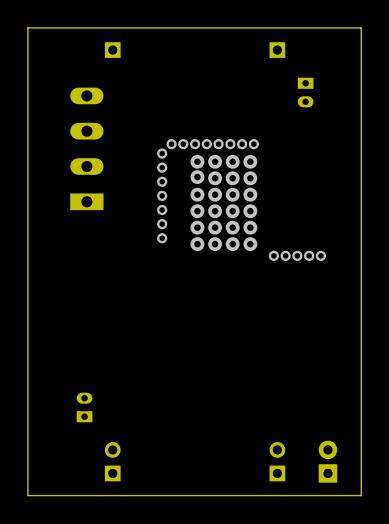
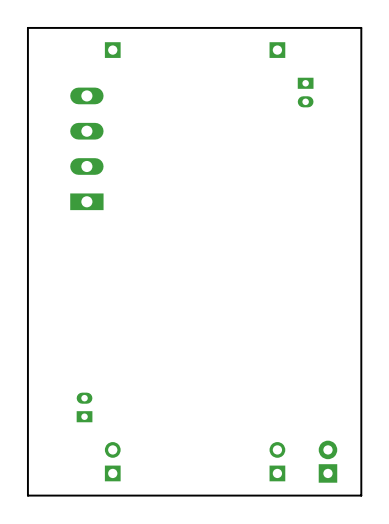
via: (171, 144) -> none
via: (183, 144) -> none
via: (195, 144) -> none
via: (206, 144) -> none
via: (218, 144) -> none
via: (230, 144) -> none
via: (242, 144) -> none
via: (253, 144) -> none
via: (162, 153) -> none
via: (197, 161) -> none
via: (215, 161) -> none
via: (232, 161) -> none
via: (250, 161) -> none
via: (162, 167) -> none
via: (197, 177) -> none
via: (215, 178) -> none
via: (232, 178) -> none
via: (250, 178) -> none
via: (162, 181) -> none
via: (197, 194) -> none
via: (215, 194) -> none
via: (232, 194) -> none
via: (250, 194) -> none
via: (162, 195) -> none
via: (162, 210) -> none
via: (197, 211) -> none
via: (215, 211) -> none
via: (232, 211) -> none
via: (250, 211) -> none
via: (162, 224) -> none
via: (197, 227) -> none
via: (215, 227) -> none
via: (232, 227) -> none
via: (250, 227) -> none
via: (162, 238) -> none
via: (197, 244) -> none
via: (215, 244) -> none
via: (232, 244) -> none
via: (250, 244) -> none
via: (273, 255) -> none
via: (285, 255) -> none
via: (297, 255) -> none
via: (309, 255) -> none
via: (320, 255) -> none

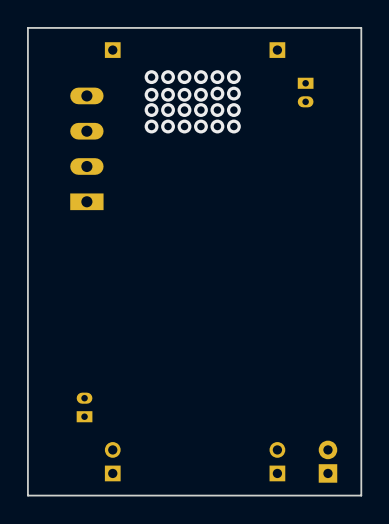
via: none -> (151, 77)
via: none -> (168, 77)
via: none -> (184, 77)
via: none -> (200, 77)
via: none -> (217, 77)
via: none -> (233, 77)
via: none -> (217, 93)
via: none -> (233, 93)
via: none -> (151, 94)
via: none -> (168, 94)
via: none -> (184, 94)
via: none -> (200, 94)
via: none -> (151, 110)
via: none -> (168, 110)
via: none -> (184, 110)
via: none -> (200, 110)
via: none -> (217, 110)
via: none -> (233, 110)
via: none -> (151, 126)
via: none -> (168, 126)
via: none -> (184, 126)
via: none -> (200, 126)
via: none -> (217, 126)
via: none -> (233, 126)

